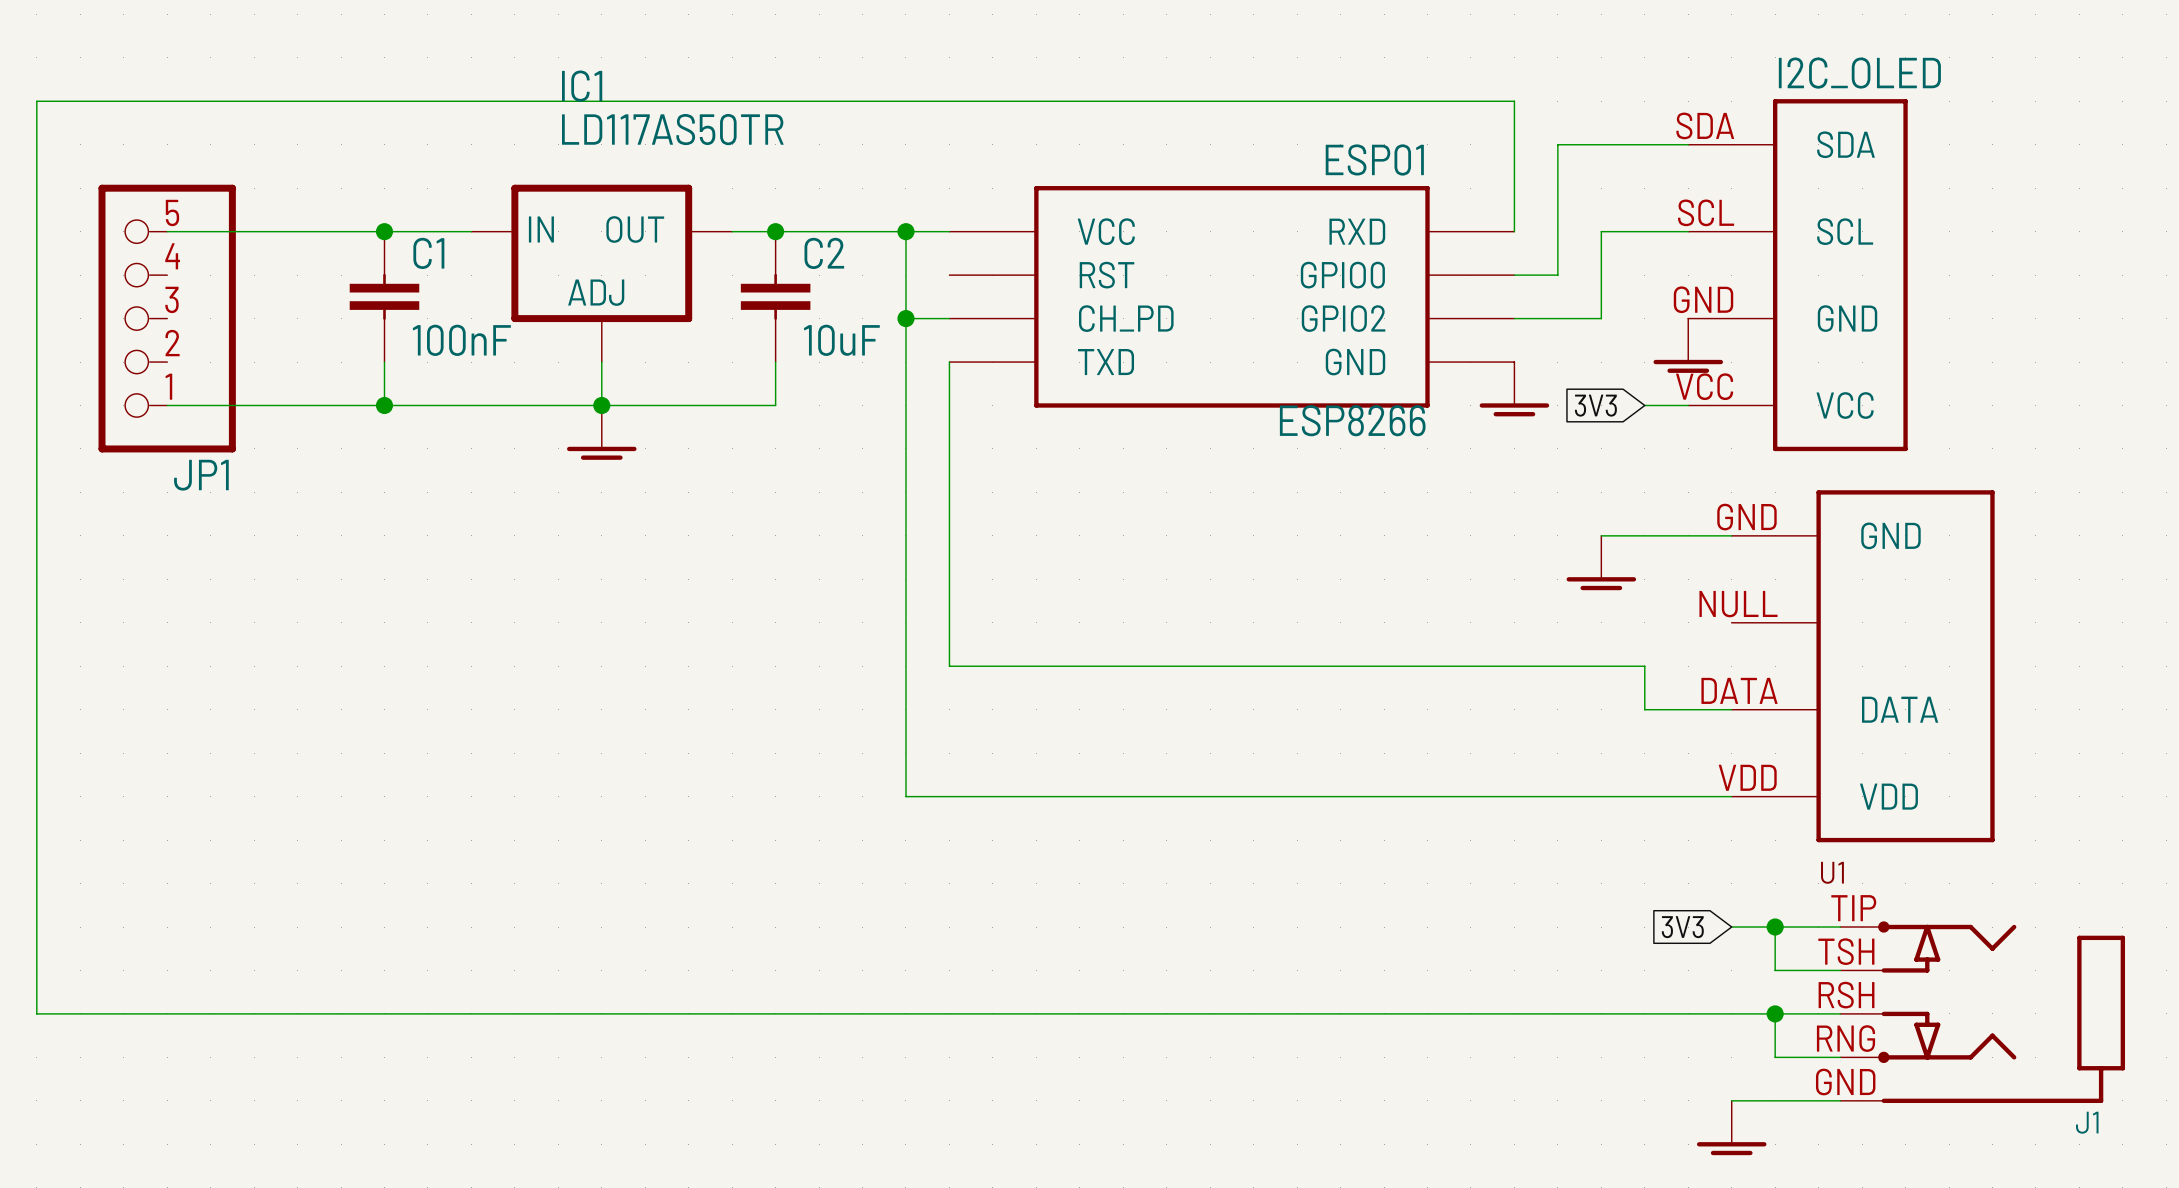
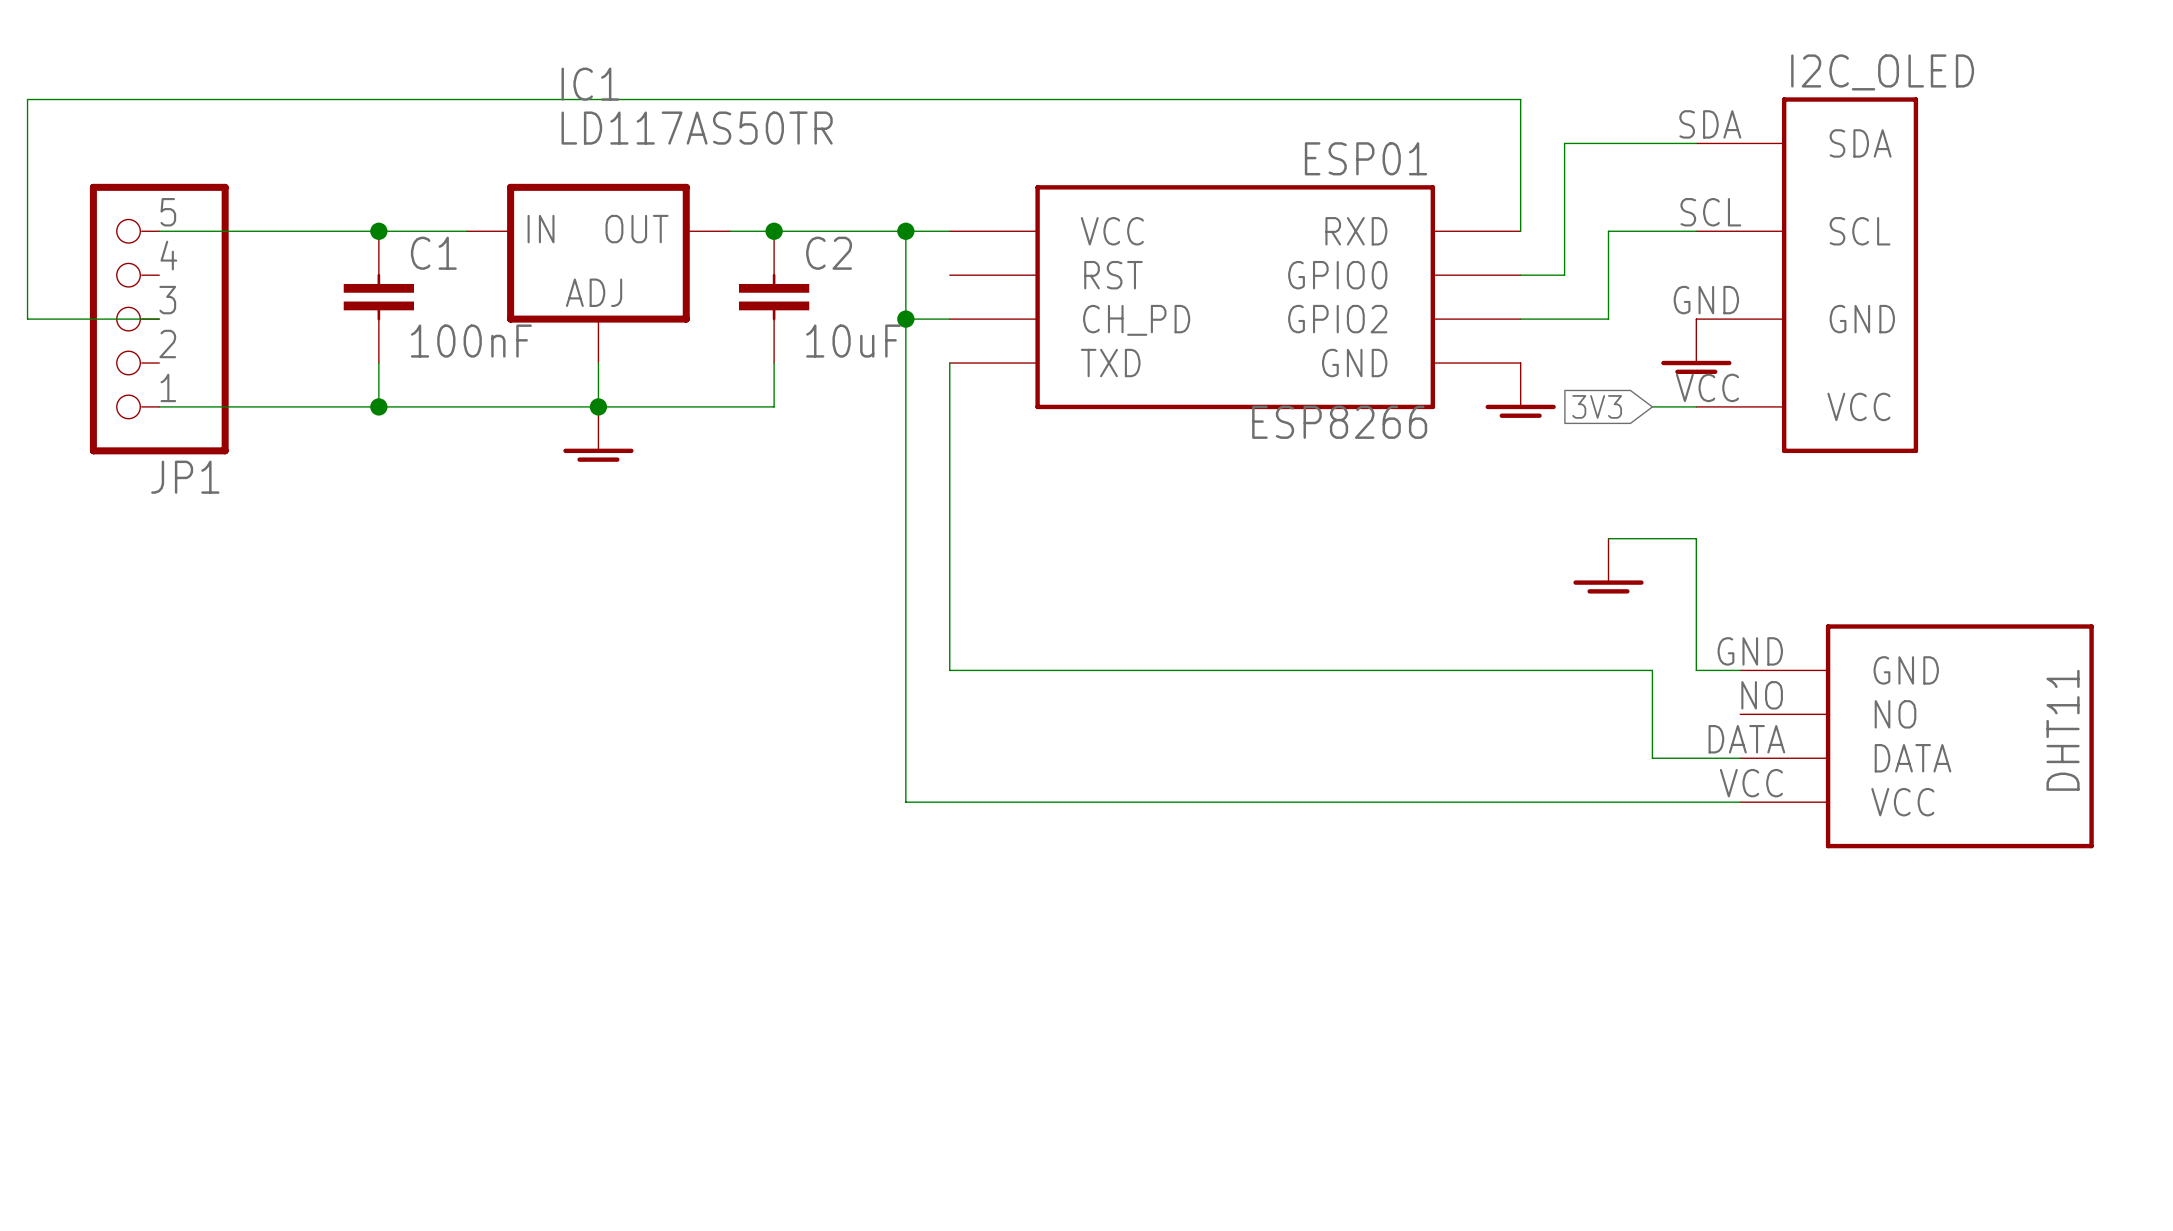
wire: (36, 318) (36, 1013) (1840, 1013) -> (27, 319) (159, 319)
wire: (1688, 535) (1731, 535) -> (1696, 538) (1696, 670) (1740, 670)
U1: (1863, 666) -> none
wire: (1644, 709) (1731, 709) -> (1652, 714) (1652, 758) (1740, 758)
part: none -> (1917, 736)
global label: 3V3 (1682, 927) -> none
wire: (1731, 927) (1840, 927) -> none
wire: (1775, 927) (1775, 970) (1840, 970) -> none
junction: (1775, 927) -> none
J1: (1982, 1012) -> none
wire: (1775, 1013) (1775, 1057) (1840, 1057) -> none
junction: (1775, 1013) -> none
wire: (1731, 1100) (1840, 1100) -> none
power symbol: (1731, 1128) -> none

